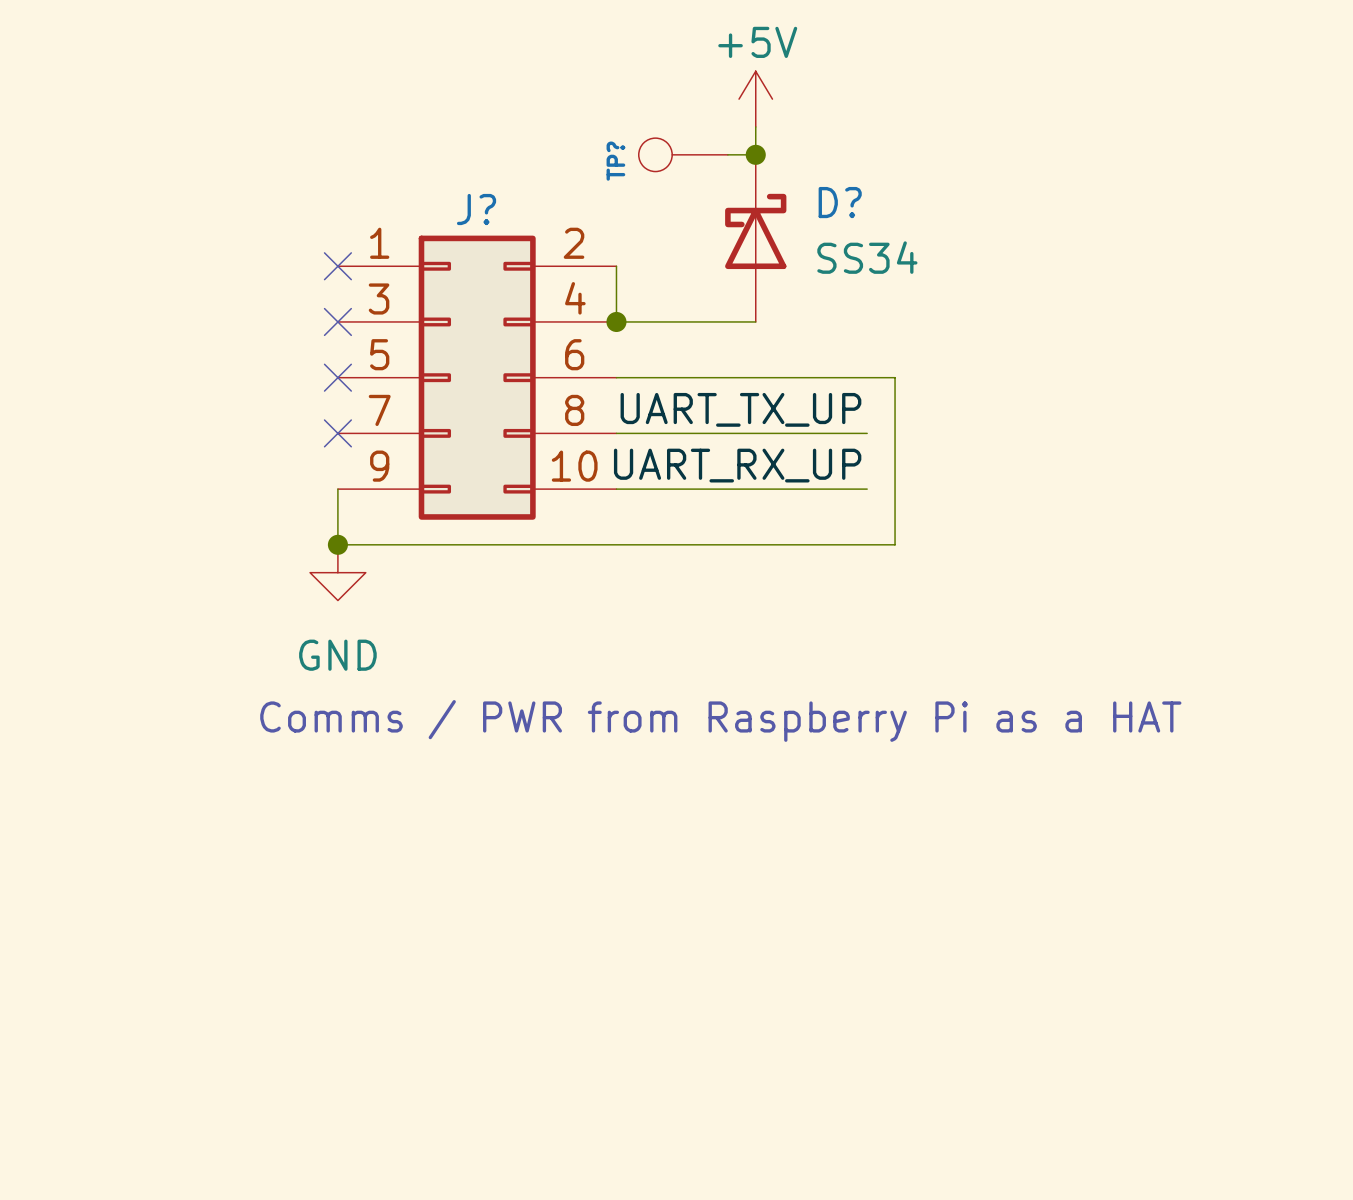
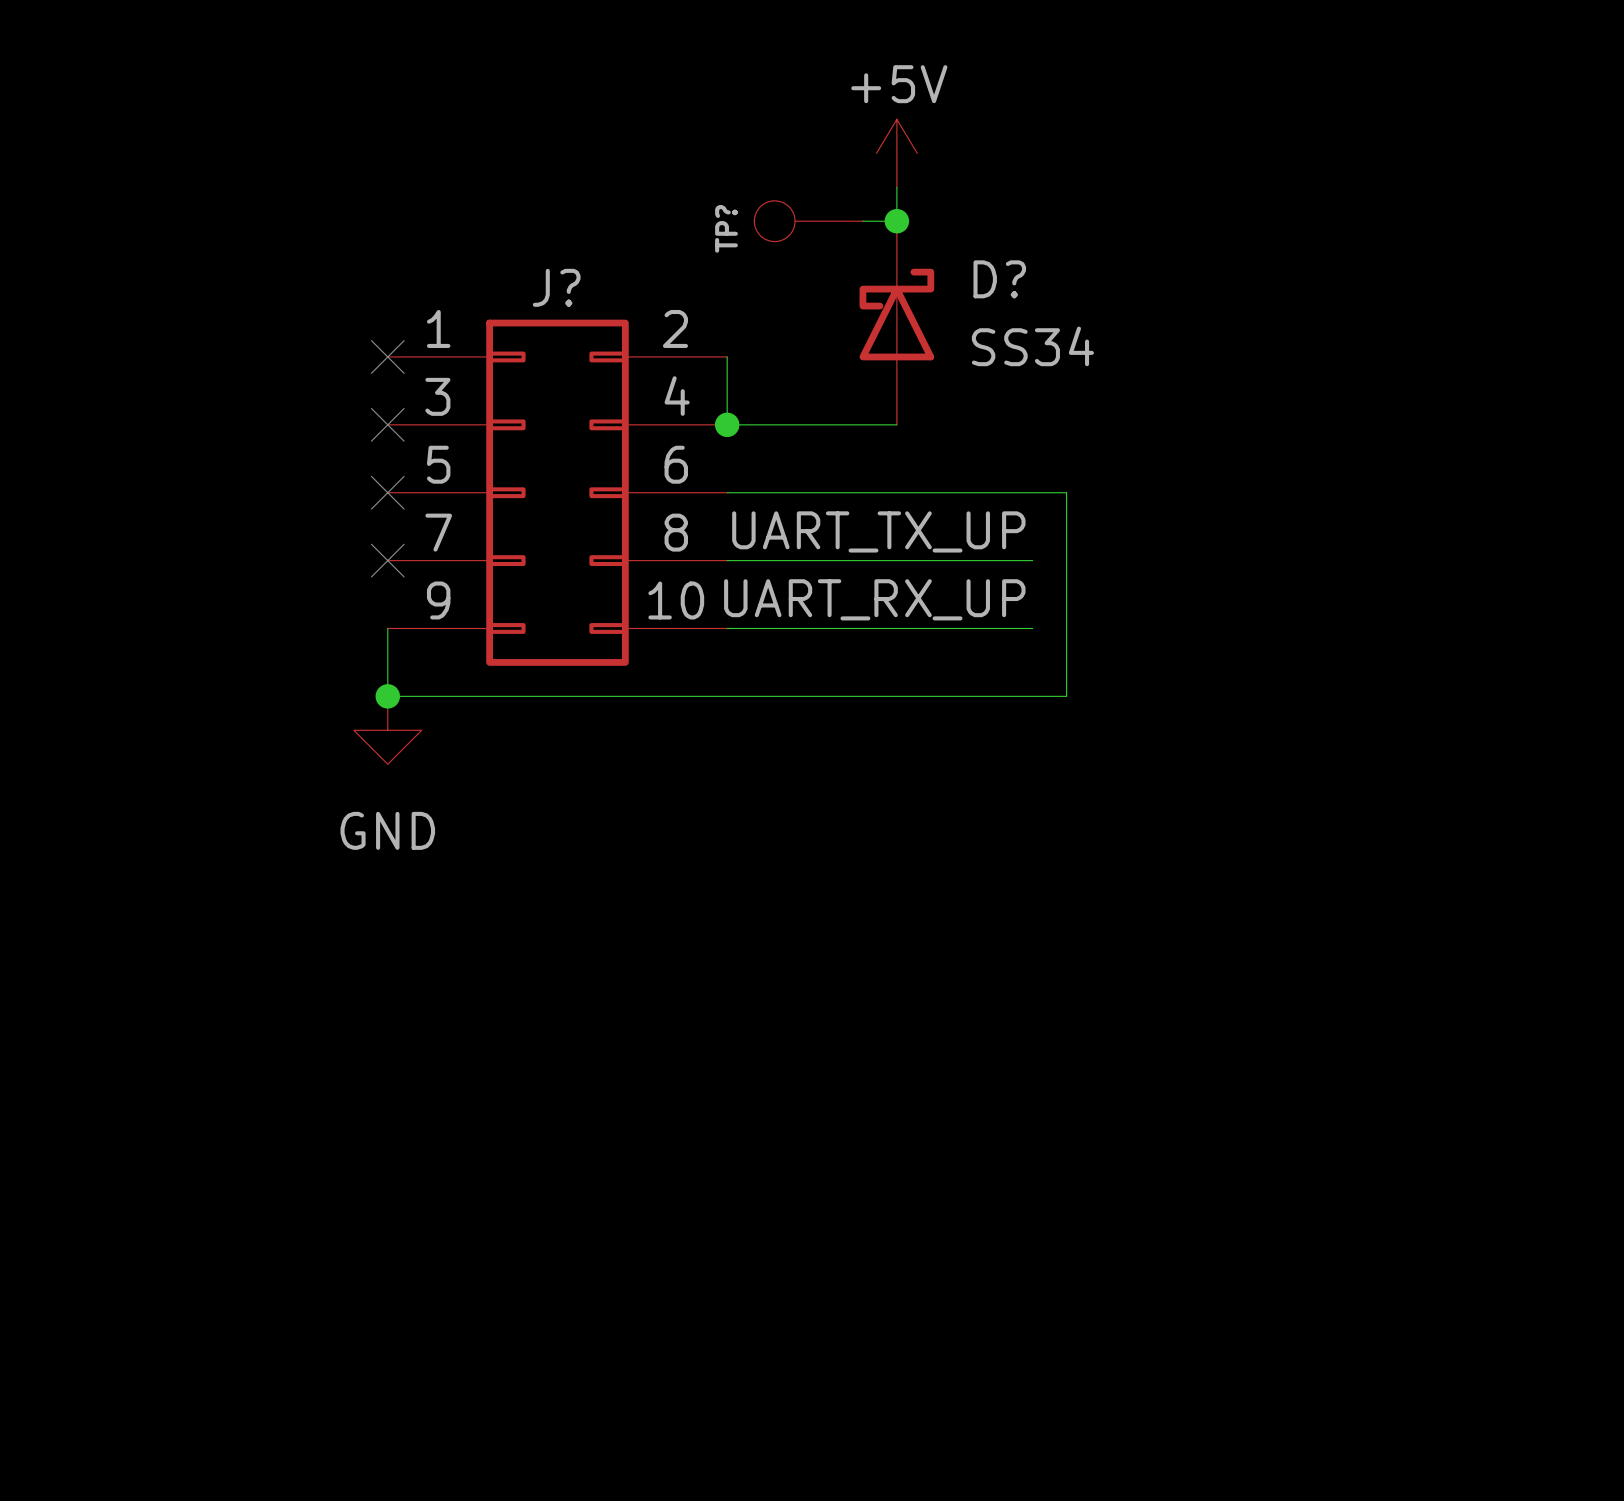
text: Comms / PWR from Raspberry Pi as a HAT (720, 720) -> none

